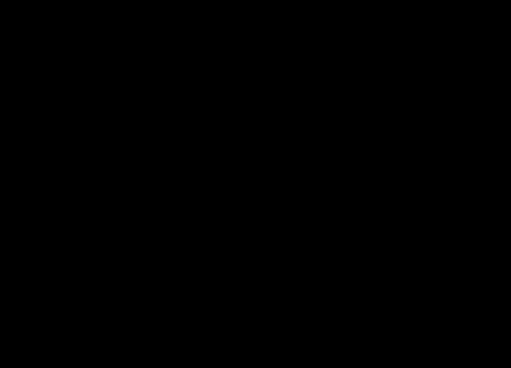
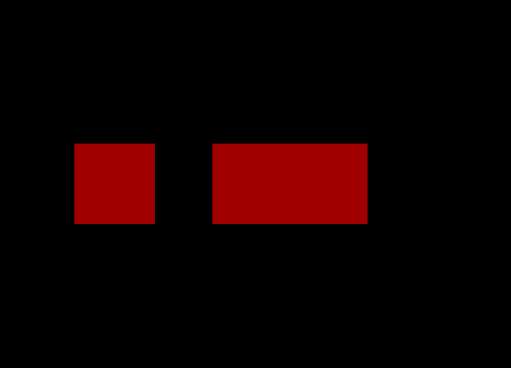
part: none -> (220, 183)

